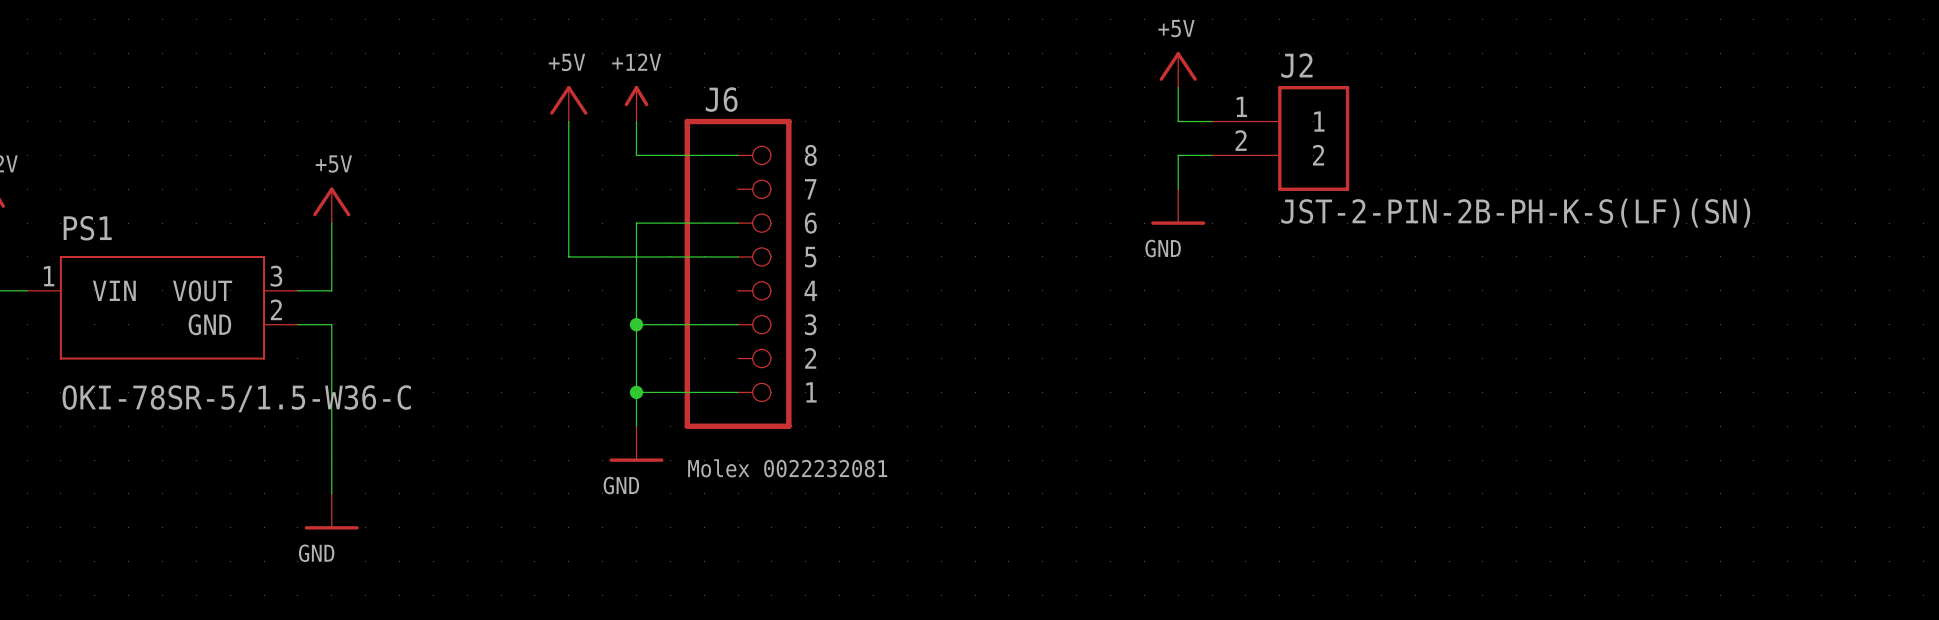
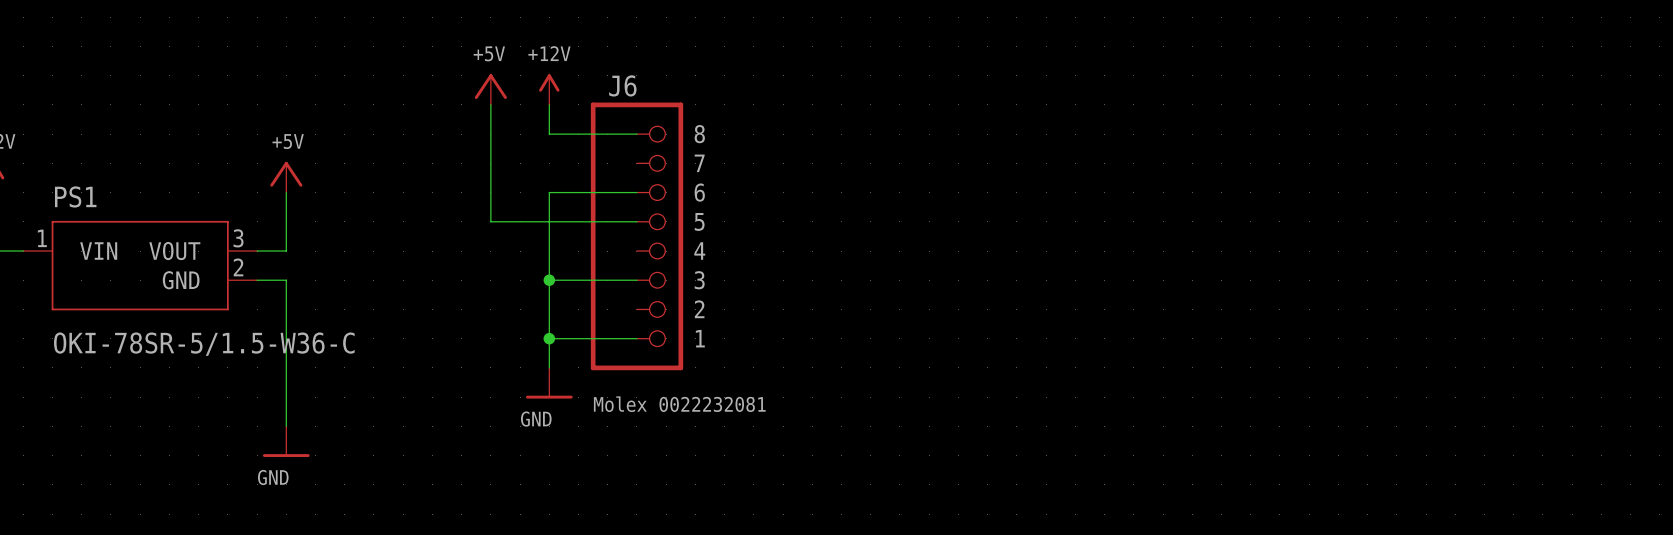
power symbol: +5V (1178, 69) -> none
wire: (1178, 87) (1178, 121) (1212, 121) -> none
J2: JST-2-PIN-2B-PH-K-S(LF)(SN) (1280, 138) -> none
wire: (1212, 155) (1178, 155) (1178, 189) -> none
power symbol: GND (1178, 207) -> none

